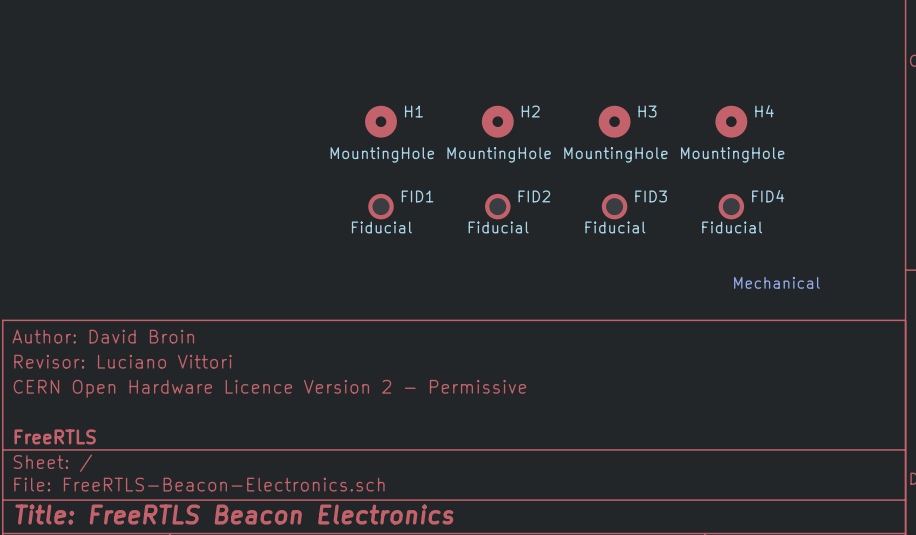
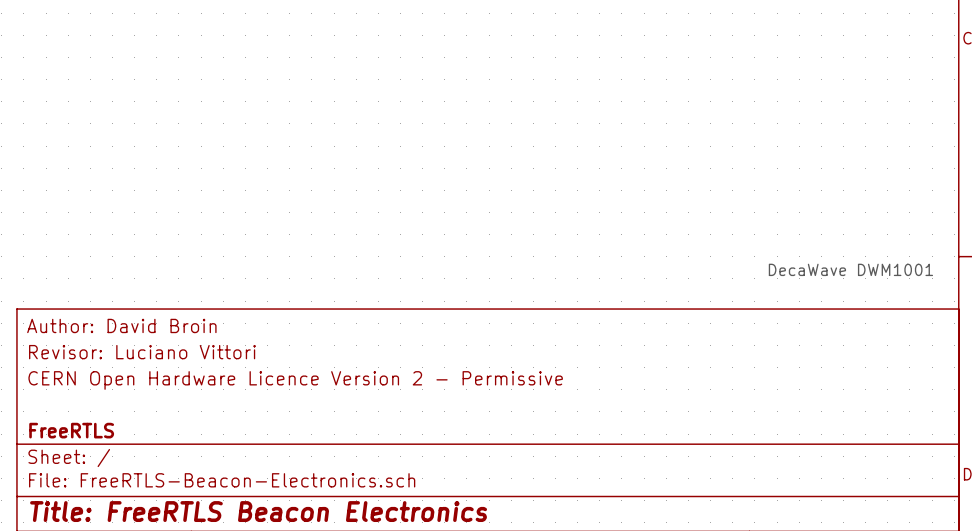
H1: MountingHole (381, 121) -> none
H2: MountingHole (497, 121) -> none
H3: MountingHole (614, 121) -> none
H4: MountingHole (731, 121) -> none
FID1: Fiducial (381, 206) -> none
FID2: Fiducial (497, 206) -> none
FID3: Fiducial (614, 206) -> none
FID4: Fiducial (731, 206) -> none
text: Mechanical (776, 282) -> none
text: none -> DecaWave DWM1001 (850, 269)

